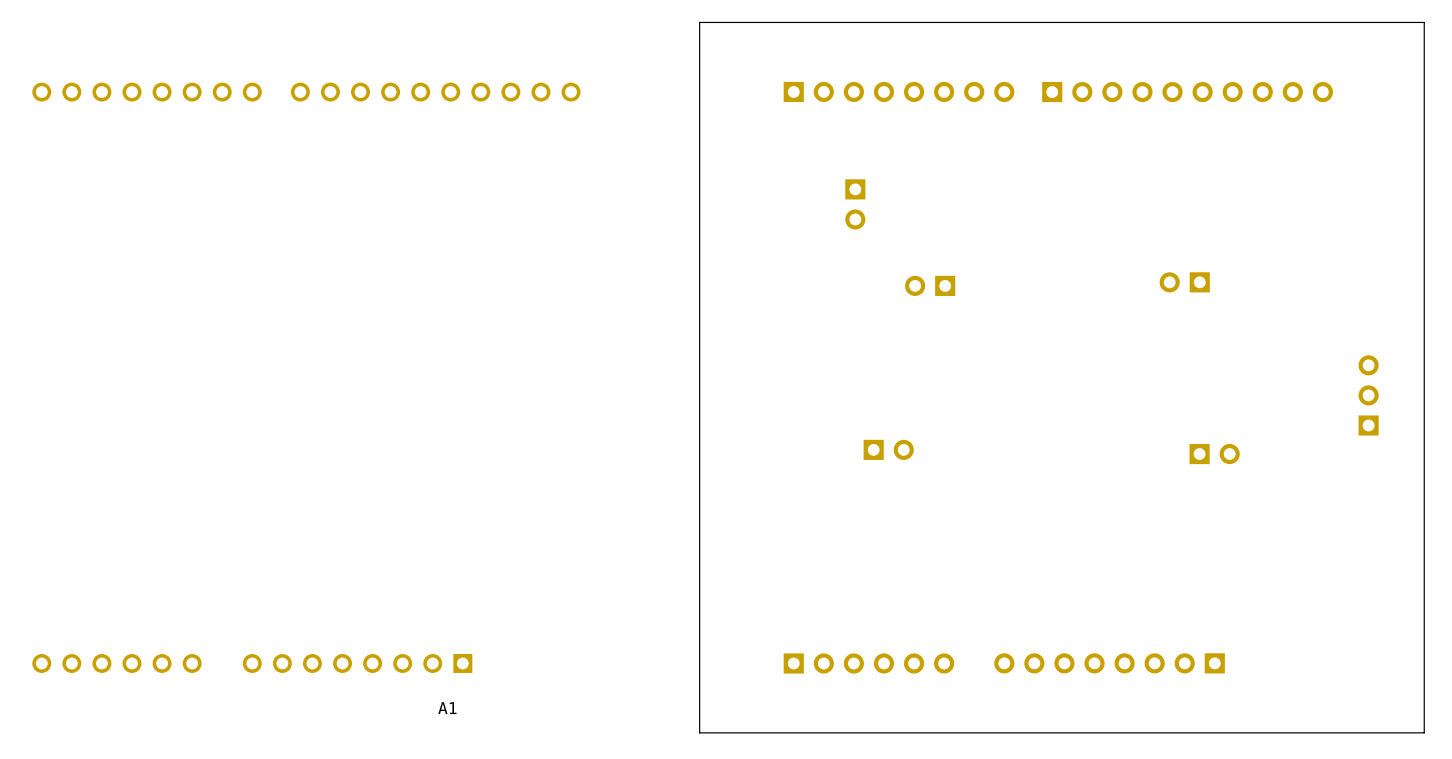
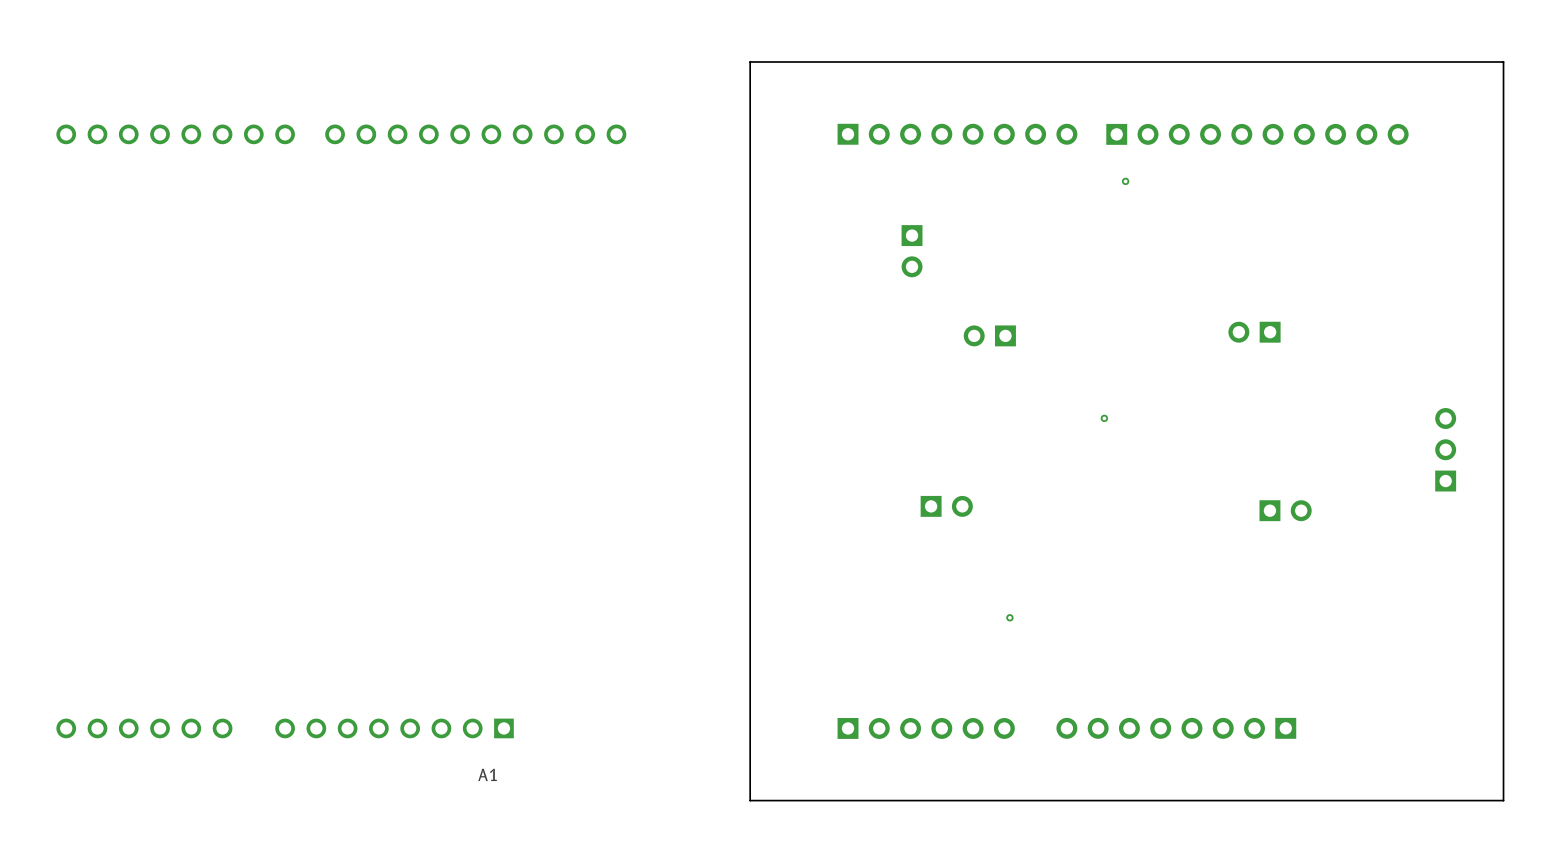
via: none -> (1125, 181)
via: none -> (1104, 418)
via: none -> (1009, 617)

